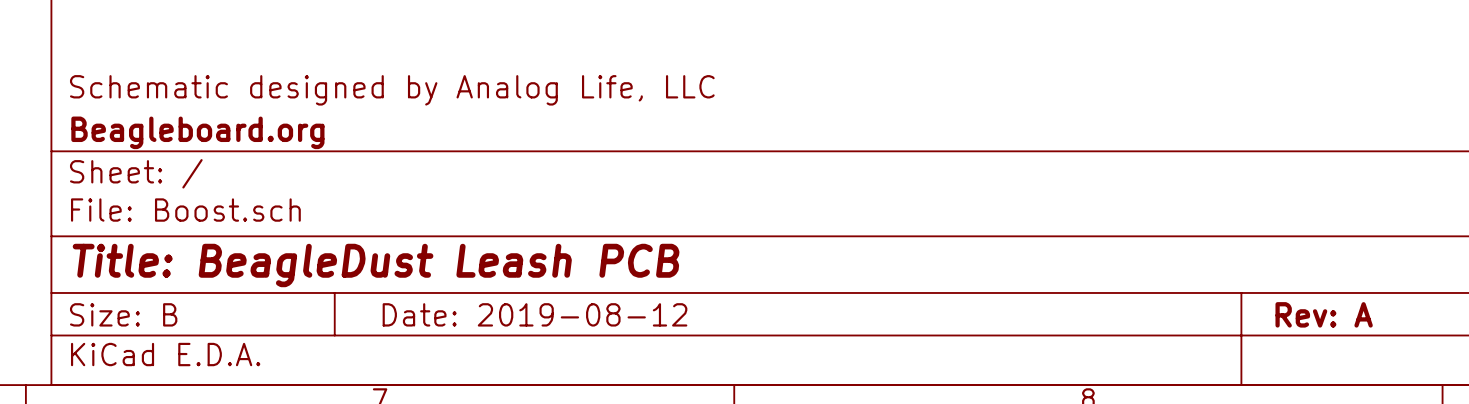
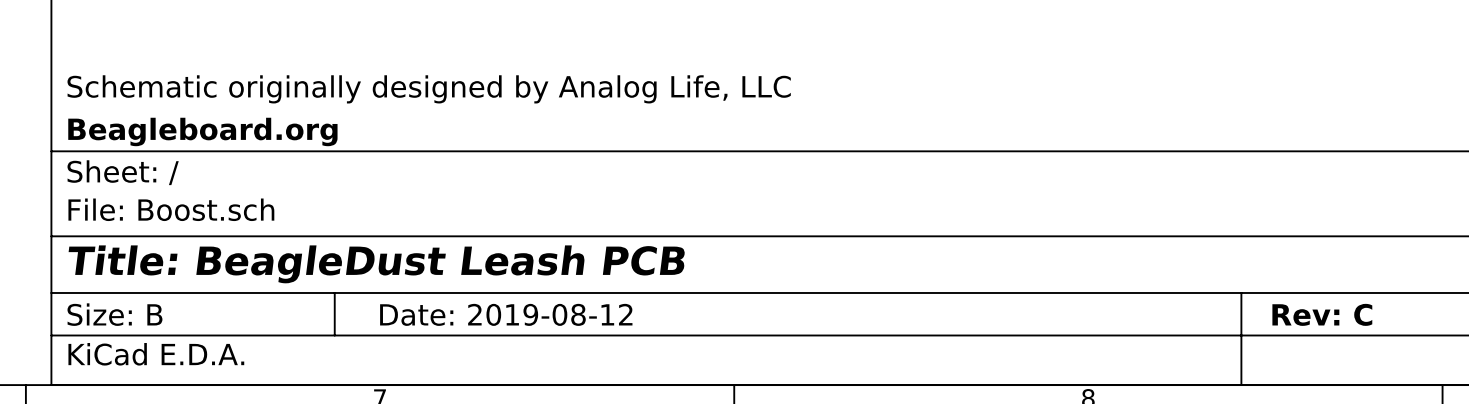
title block: Schematic designed by Analog Life, LLC (392, 90) -> Schematic originally designed by Analog Life, LLC (429, 89)
title block: Rev: A (1324, 314) -> Rev: C (1322, 314)

